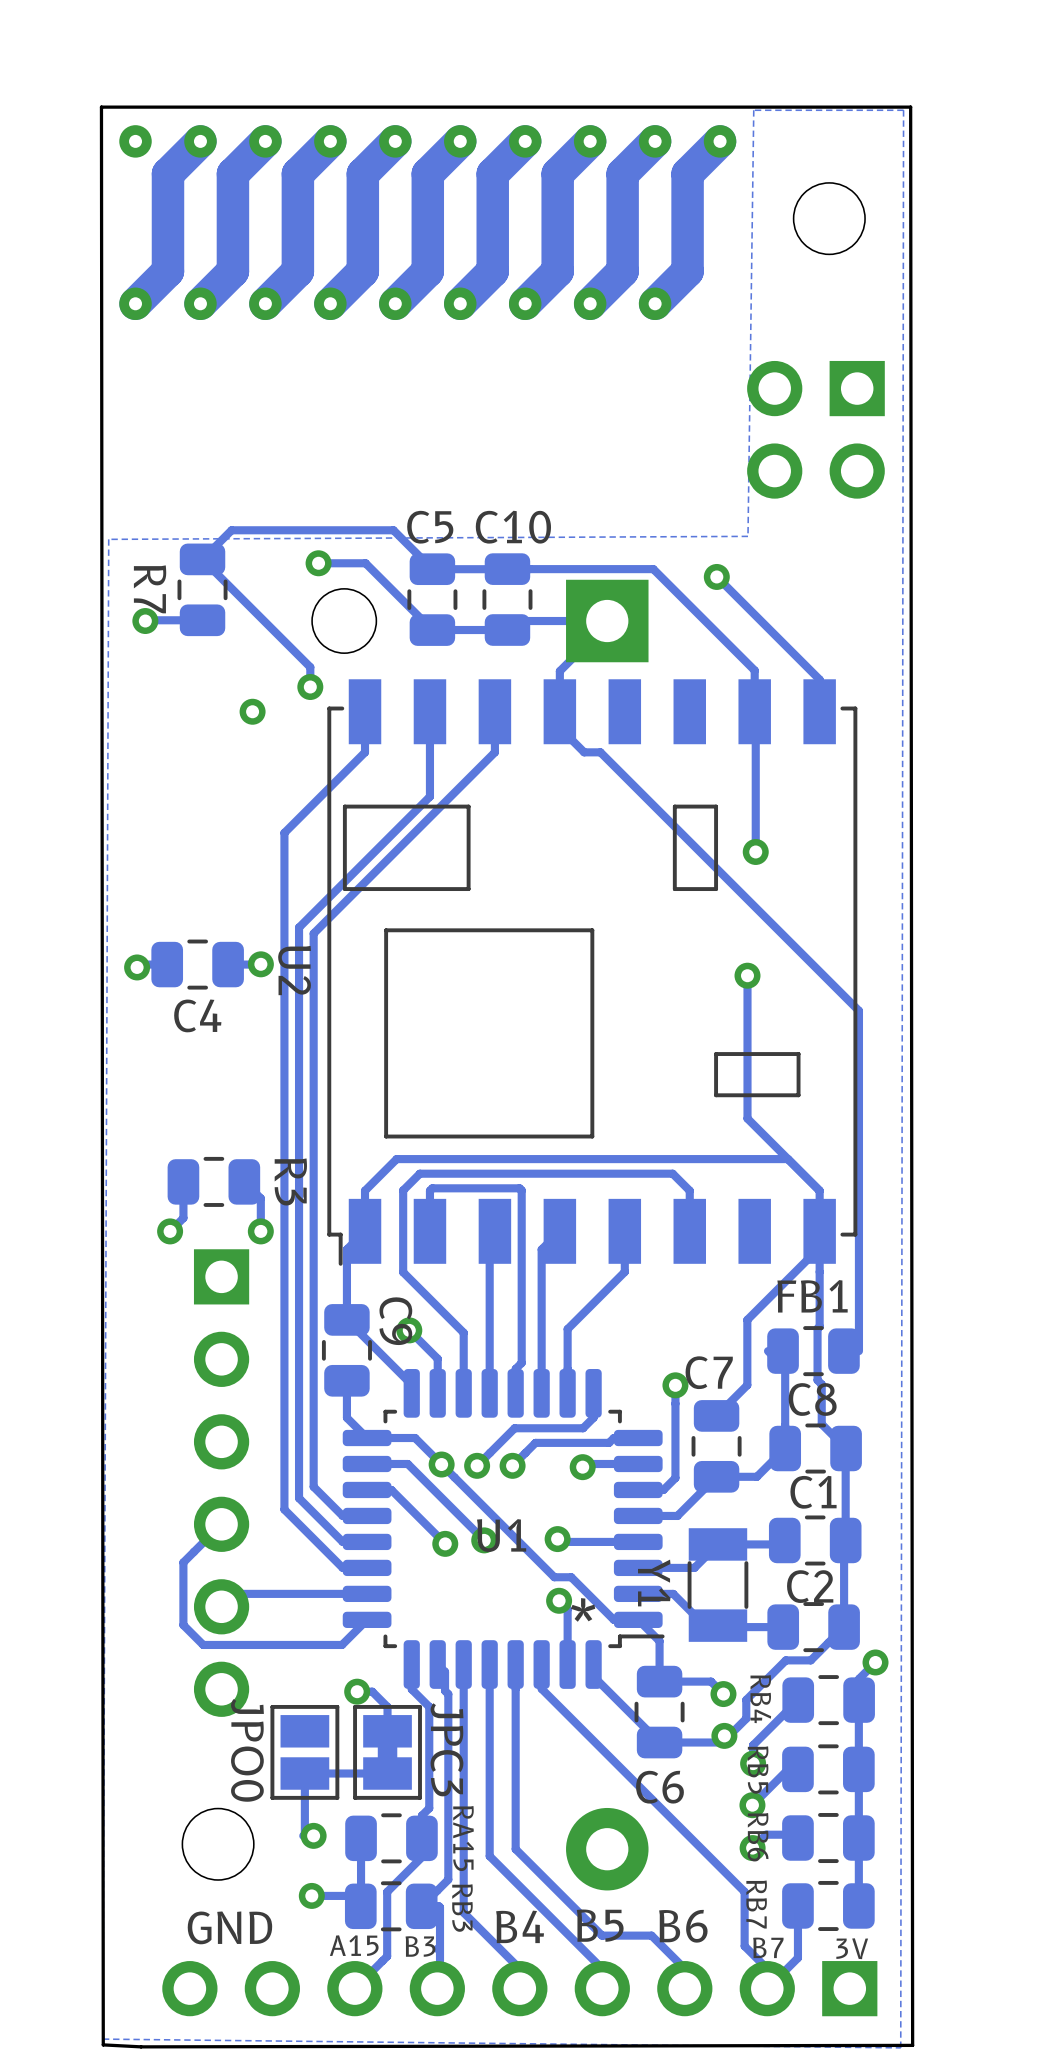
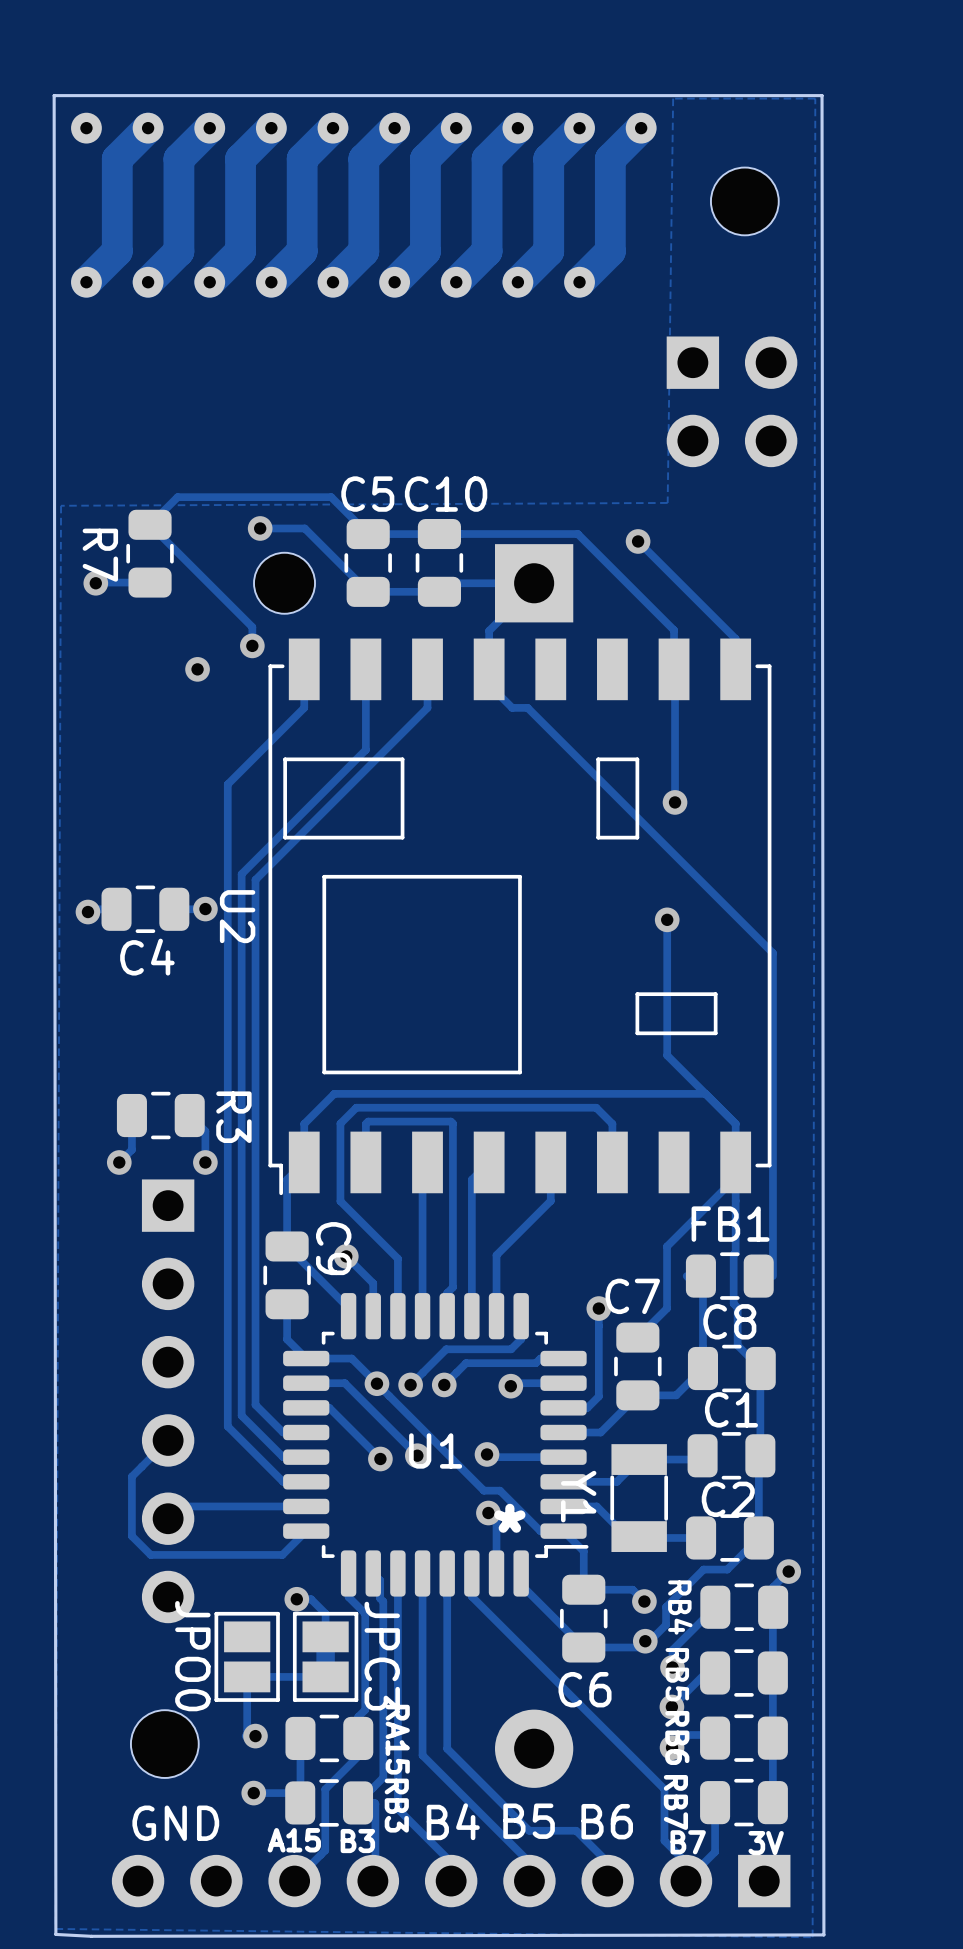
part rotation: 0° (815, 429) -> 90° counterclockwise (732, 401)

